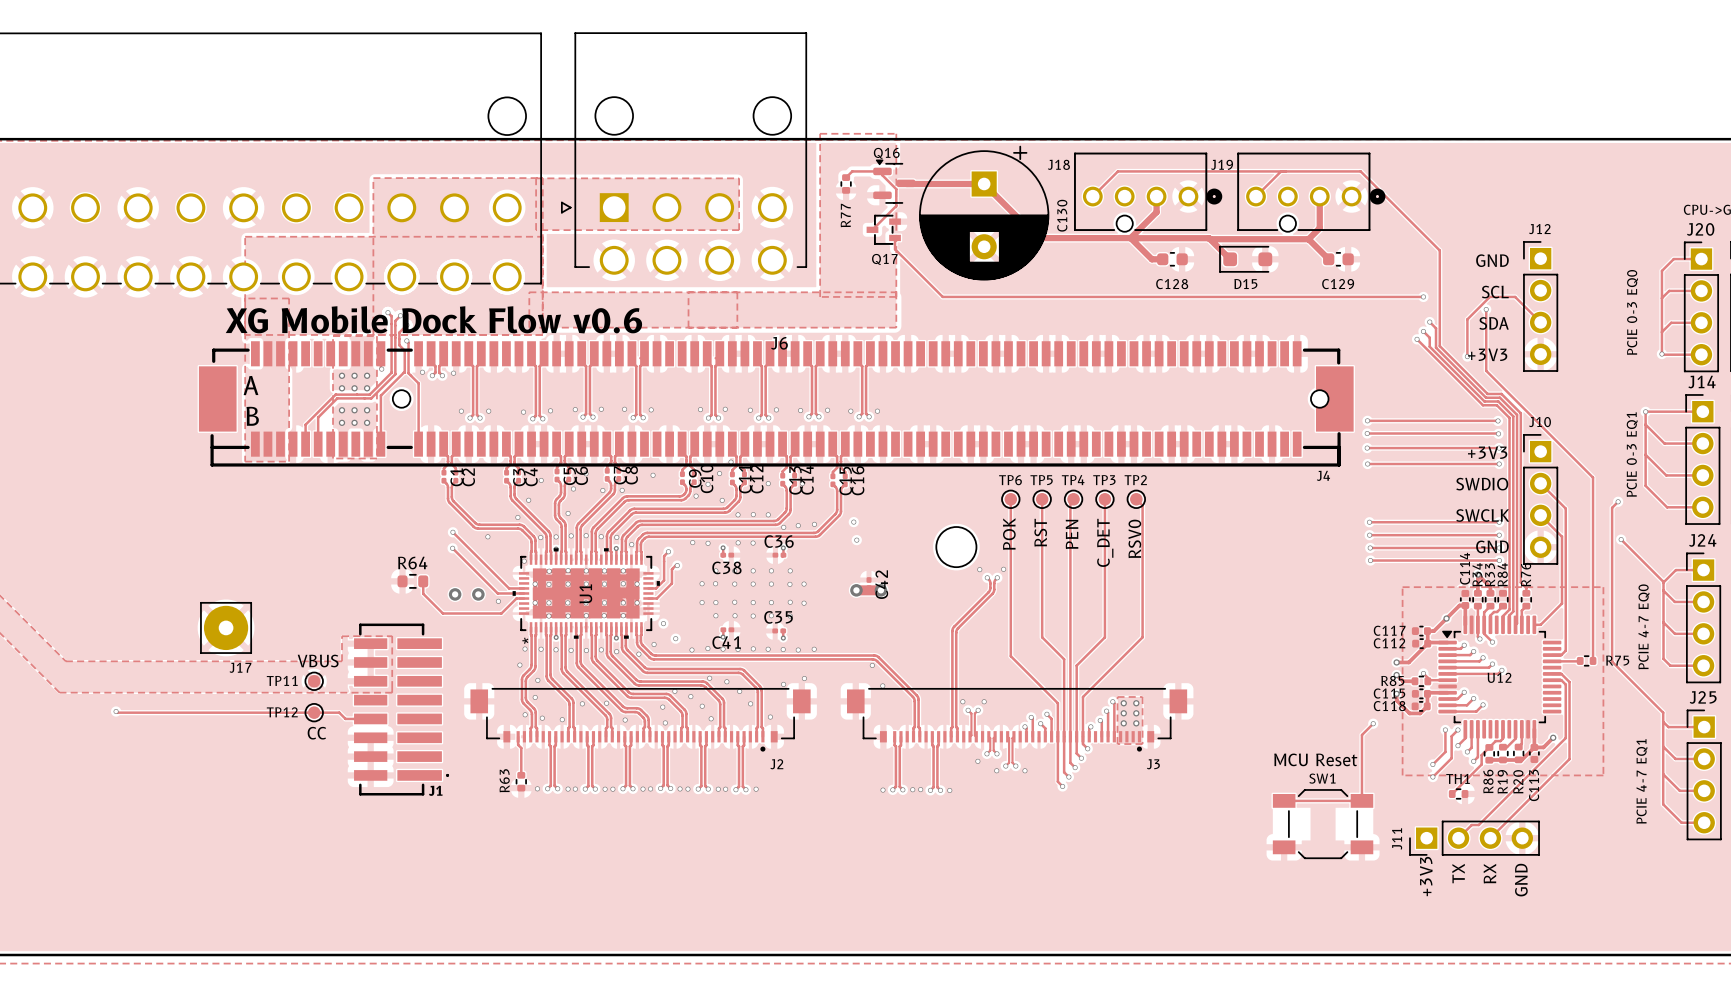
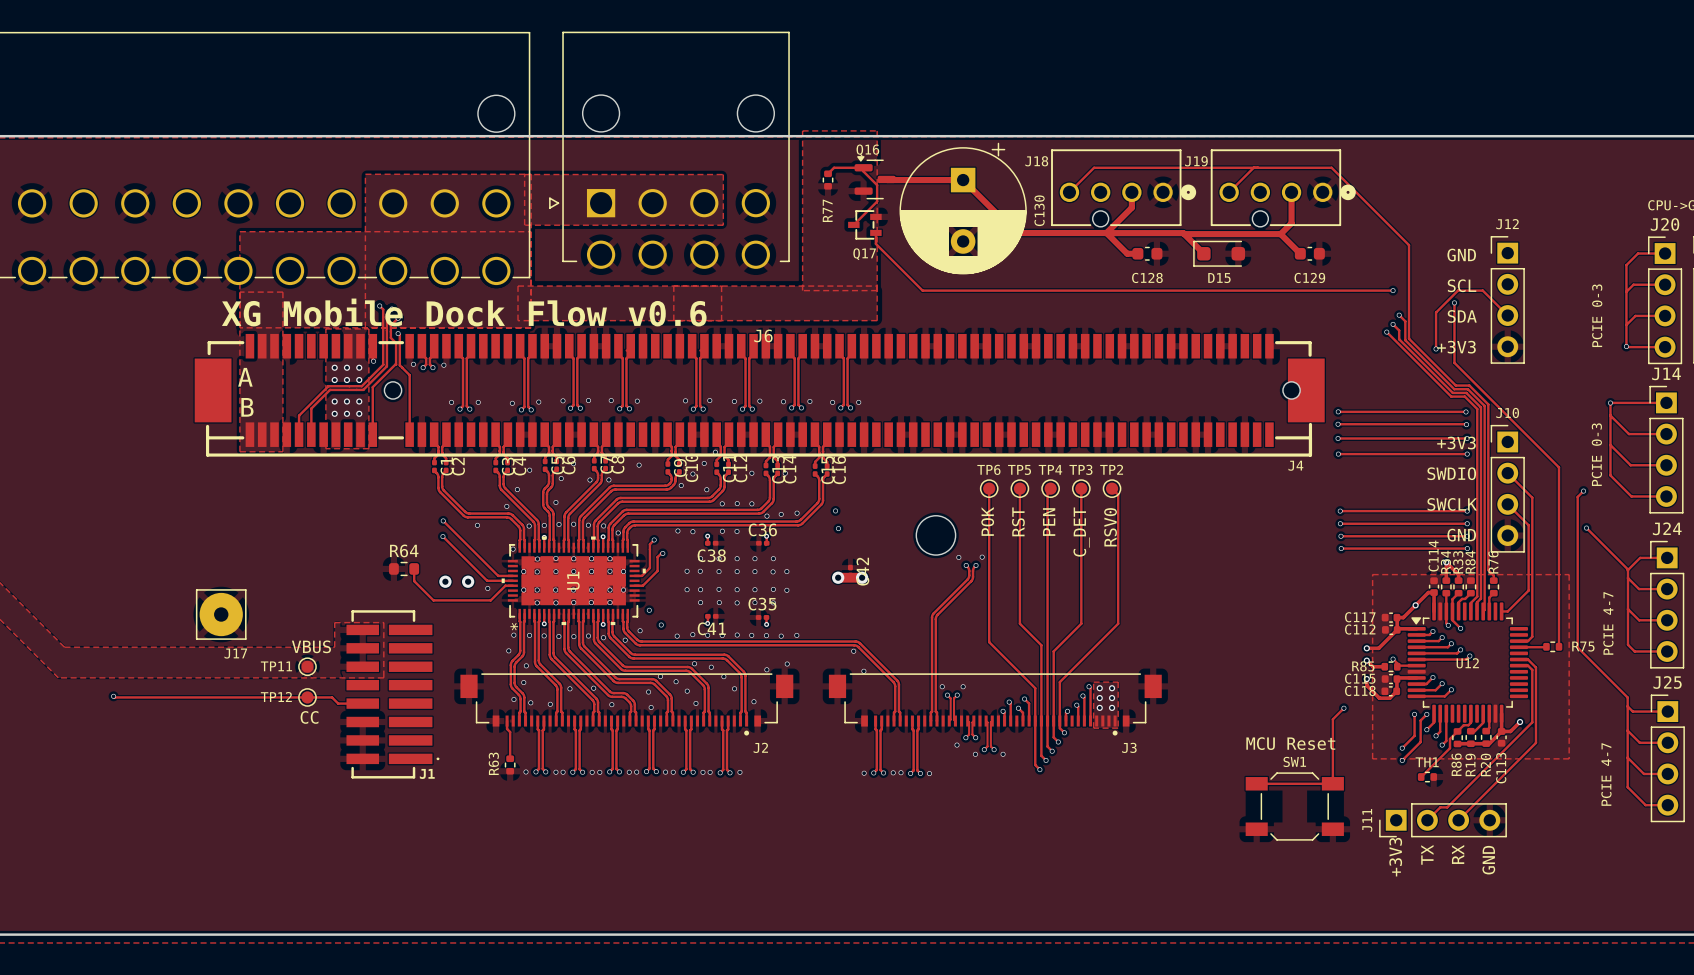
text: PCIE 0-3 EQ0 (1632, 312) -> PCIE 0-3 (1597, 315)
text: PCIE 0-3 EQ1 (1632, 454) -> PCIE 0-3 (1596, 454)
text: PCIE 4-7 EQ0 (1644, 626) -> PCIE 4-7 (1608, 623)
text: PCIE 4-7 EQ1 (1641, 781) -> PCIE 4-7 (1606, 774)

